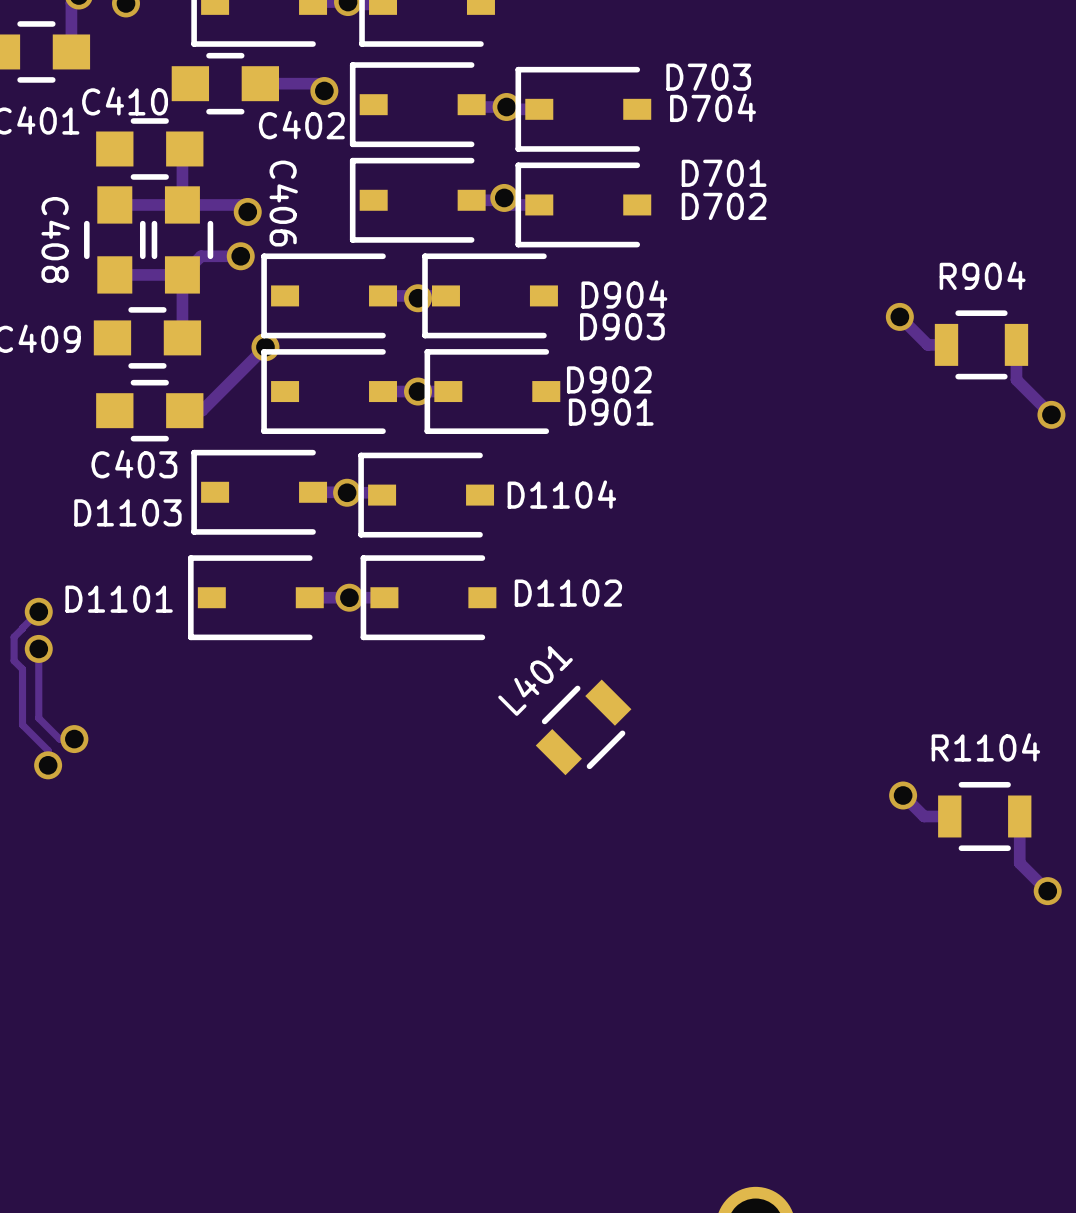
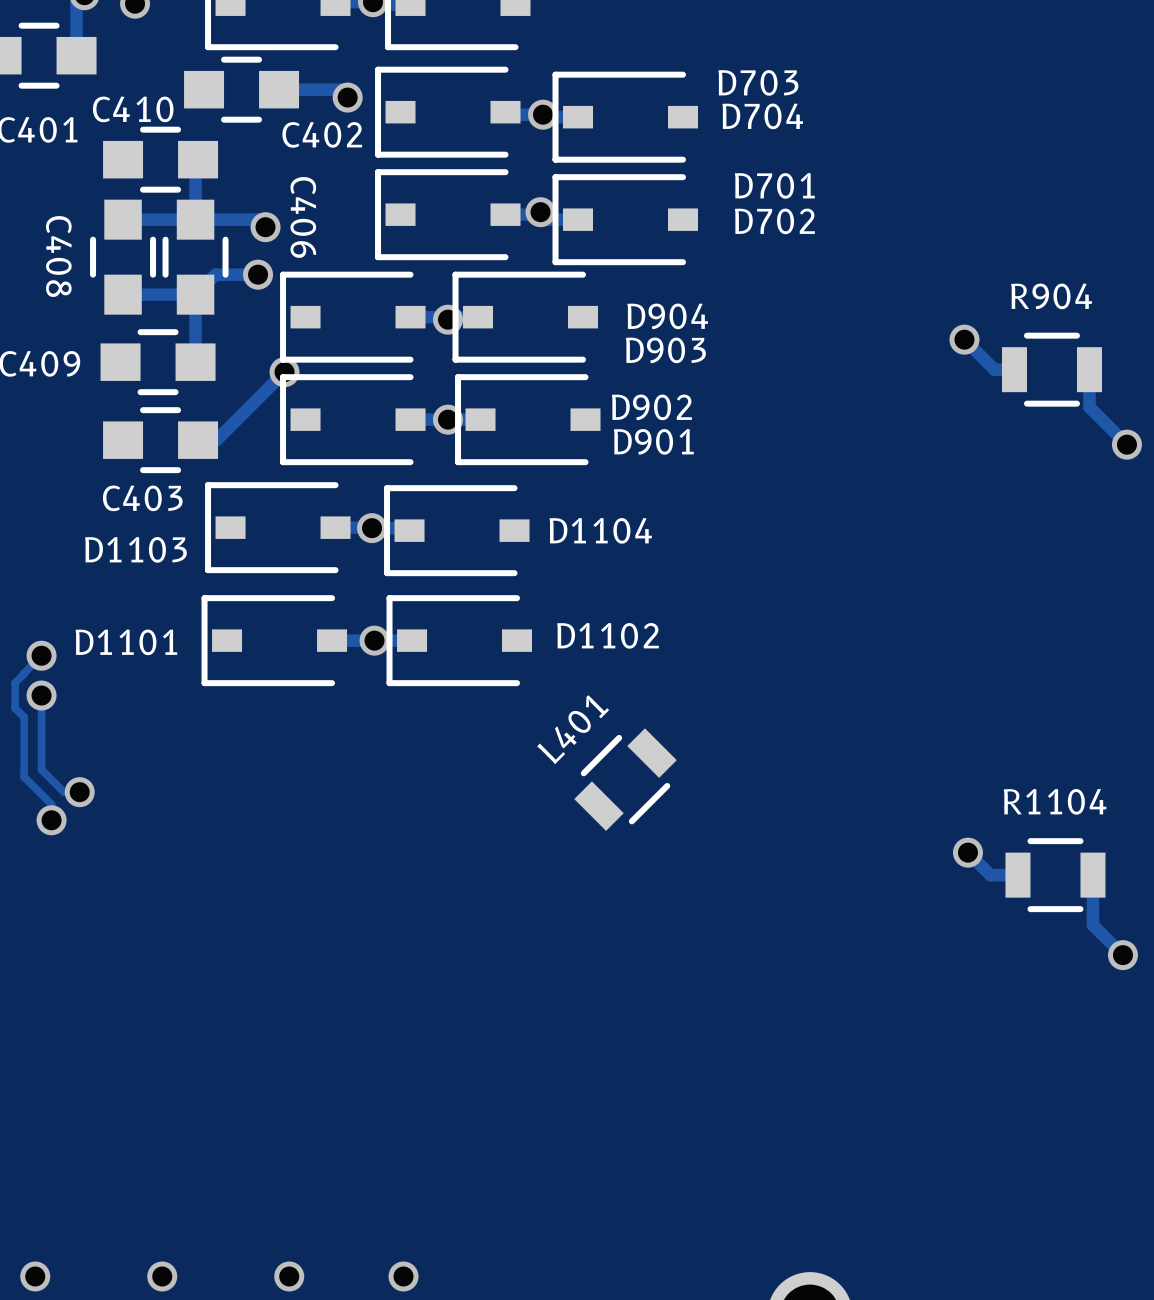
via: none -> (35, 1276)
via: none -> (162, 1276)
via: none -> (289, 1276)
via: none -> (403, 1276)

